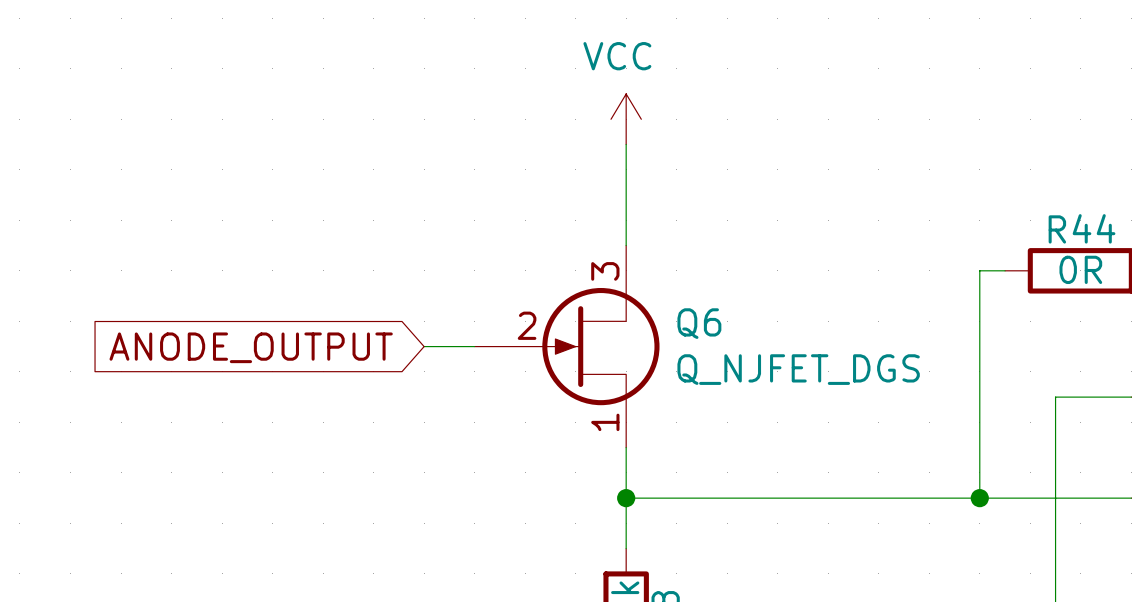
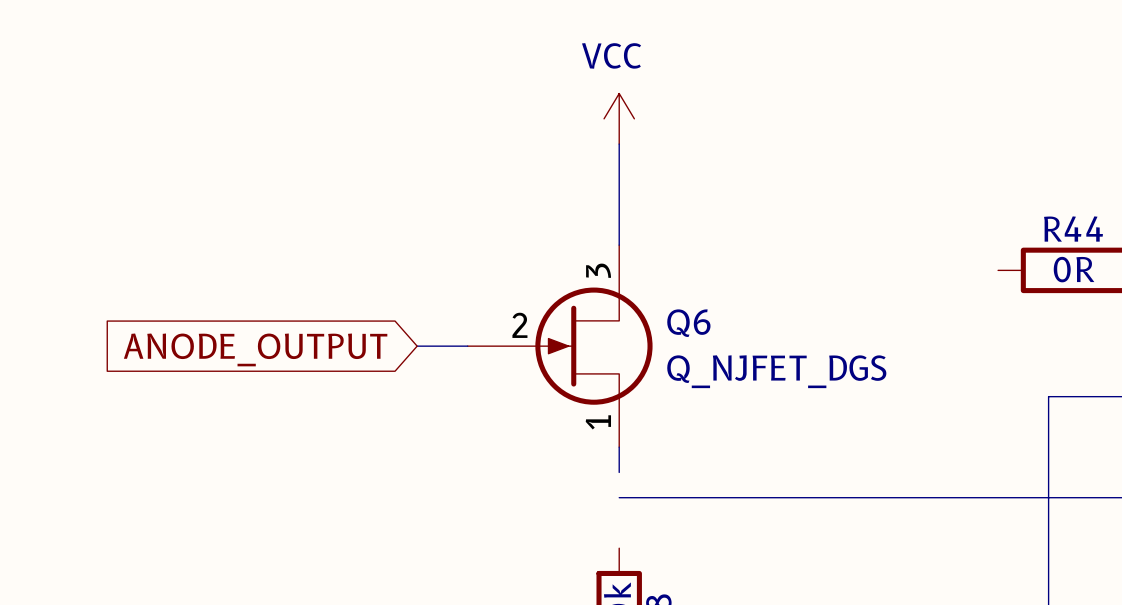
wire: (1005, 270) (979, 270) (979, 498) -> none
wire: (626, 472) (626, 548) -> none
junction: (626, 498) -> none
junction: (979, 498) -> none

